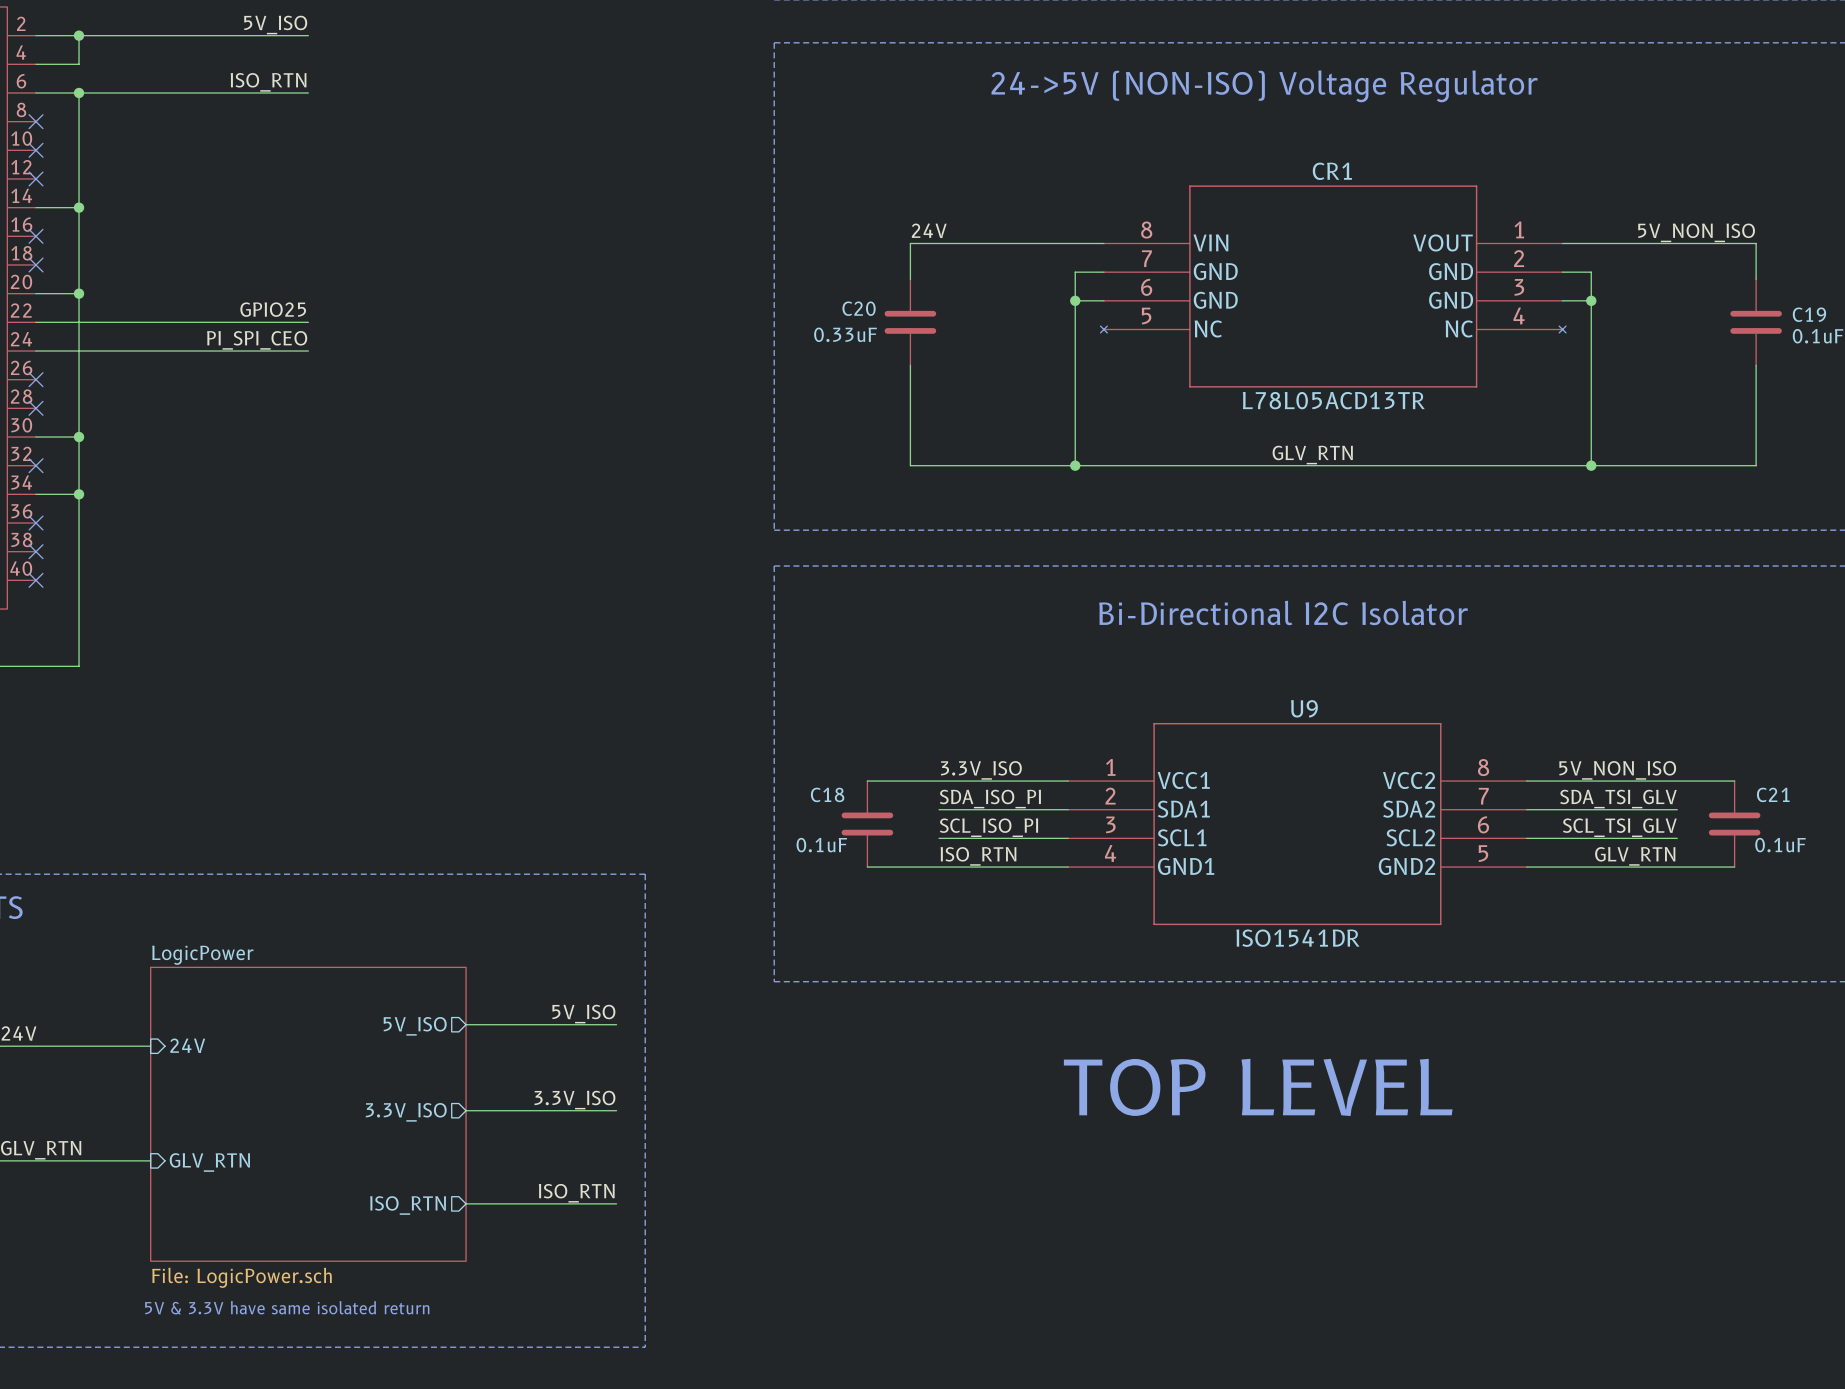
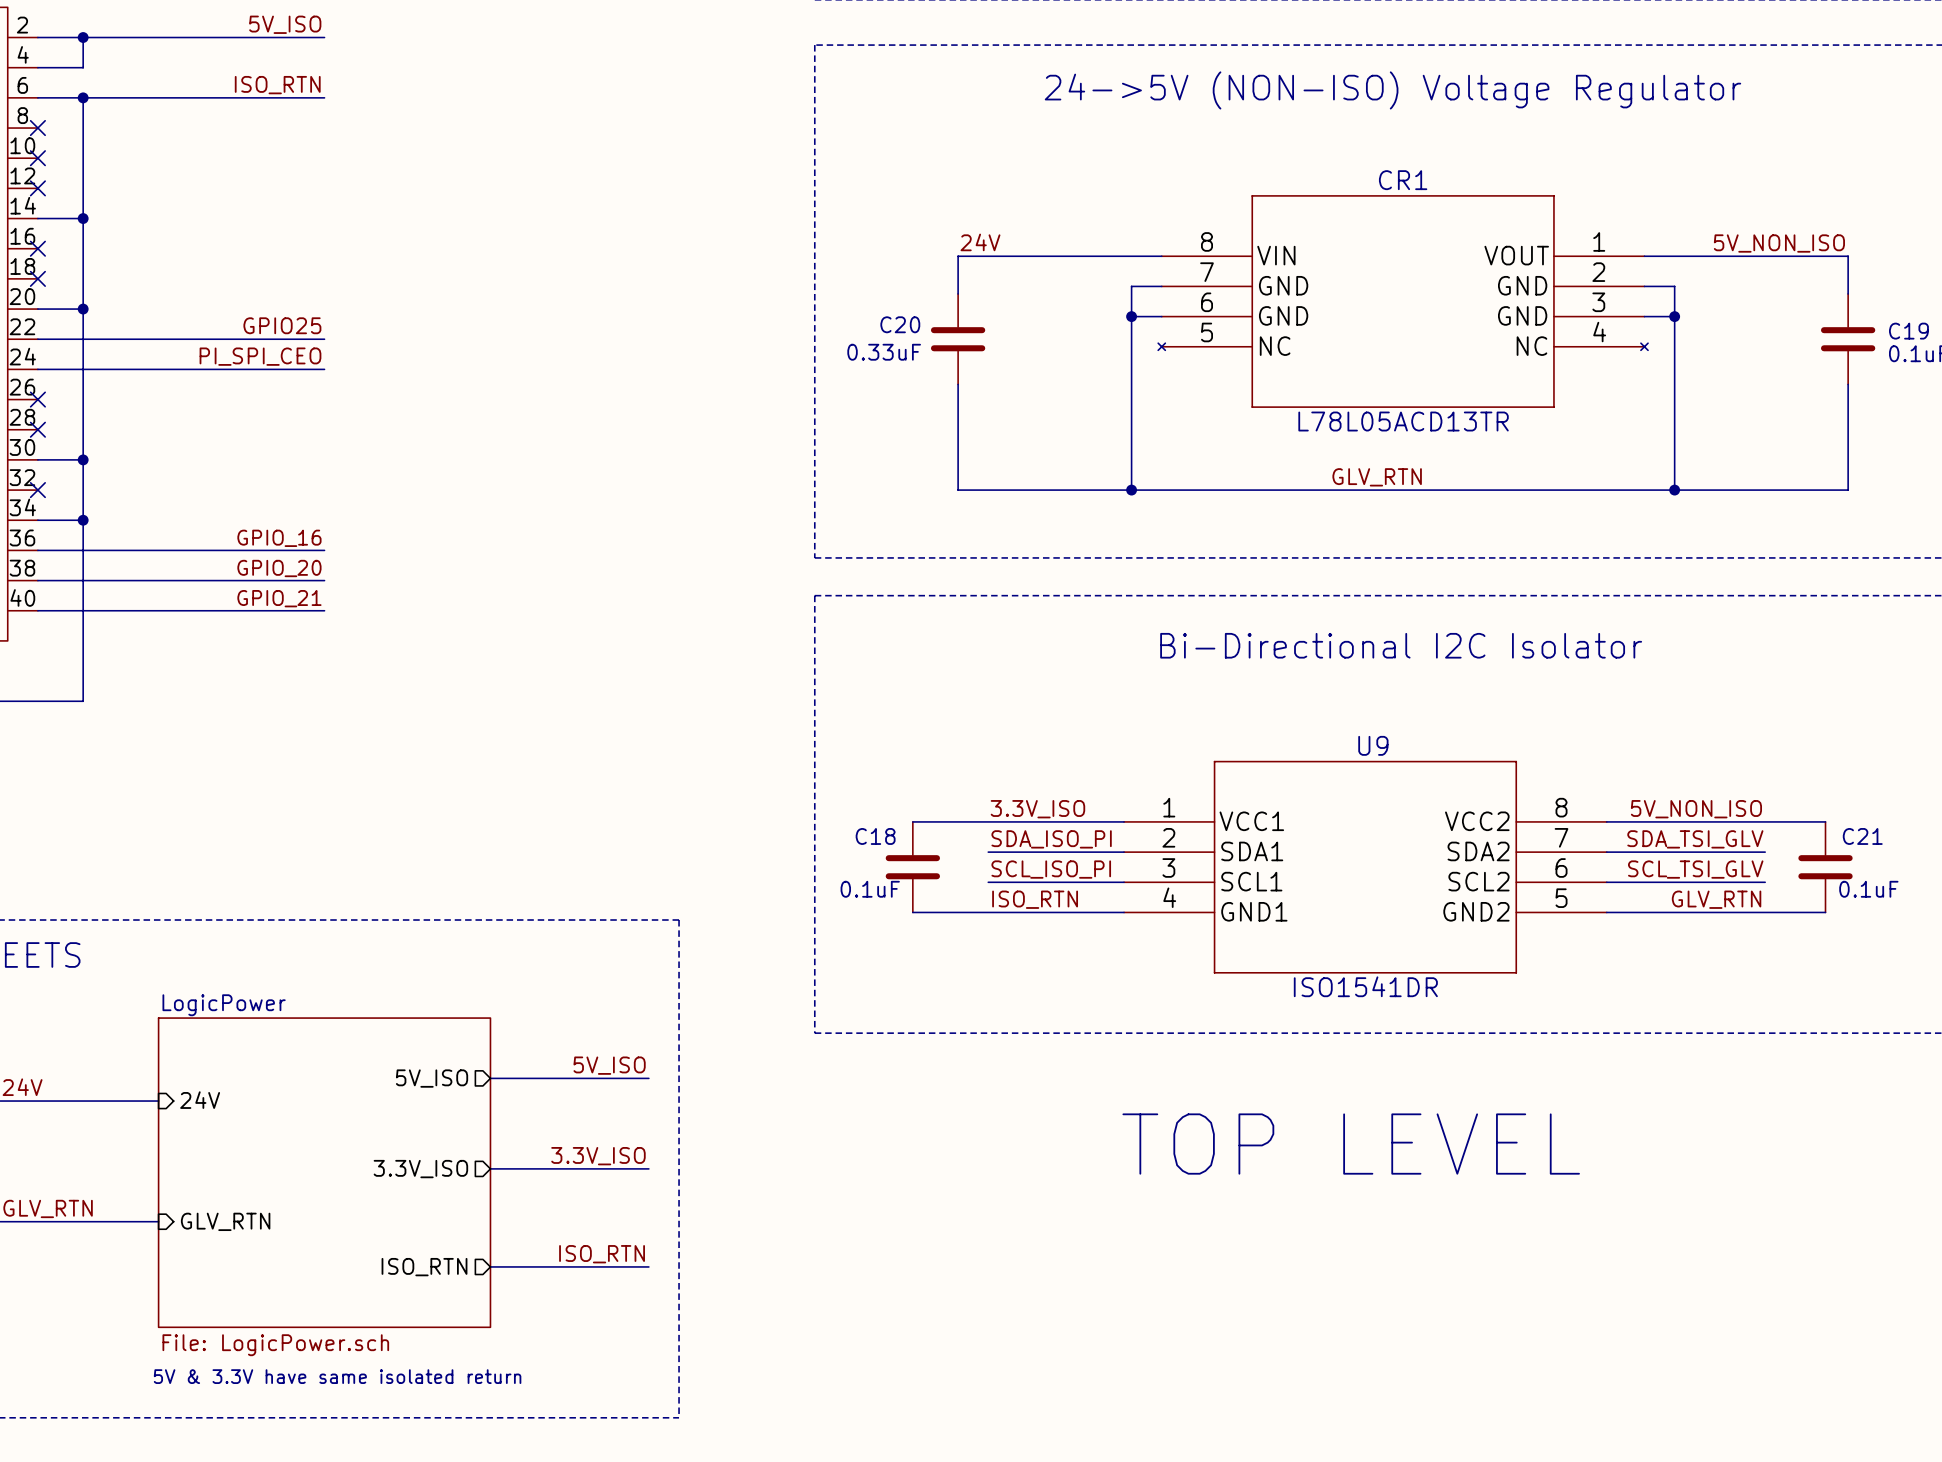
label: none -> GPIO_16 (279, 538)
wire: none -> (37, 550) (324, 550)
no-connect mark: (36, 523) -> none
label: none -> GPIO_20 (279, 568)
wire: none -> (37, 580) (324, 580)
no-connect mark: (36, 551) -> none
label: none -> GPIO_21 (279, 598)
wire: none -> (37, 610) (324, 610)
no-connect mark: (36, 580) -> none

